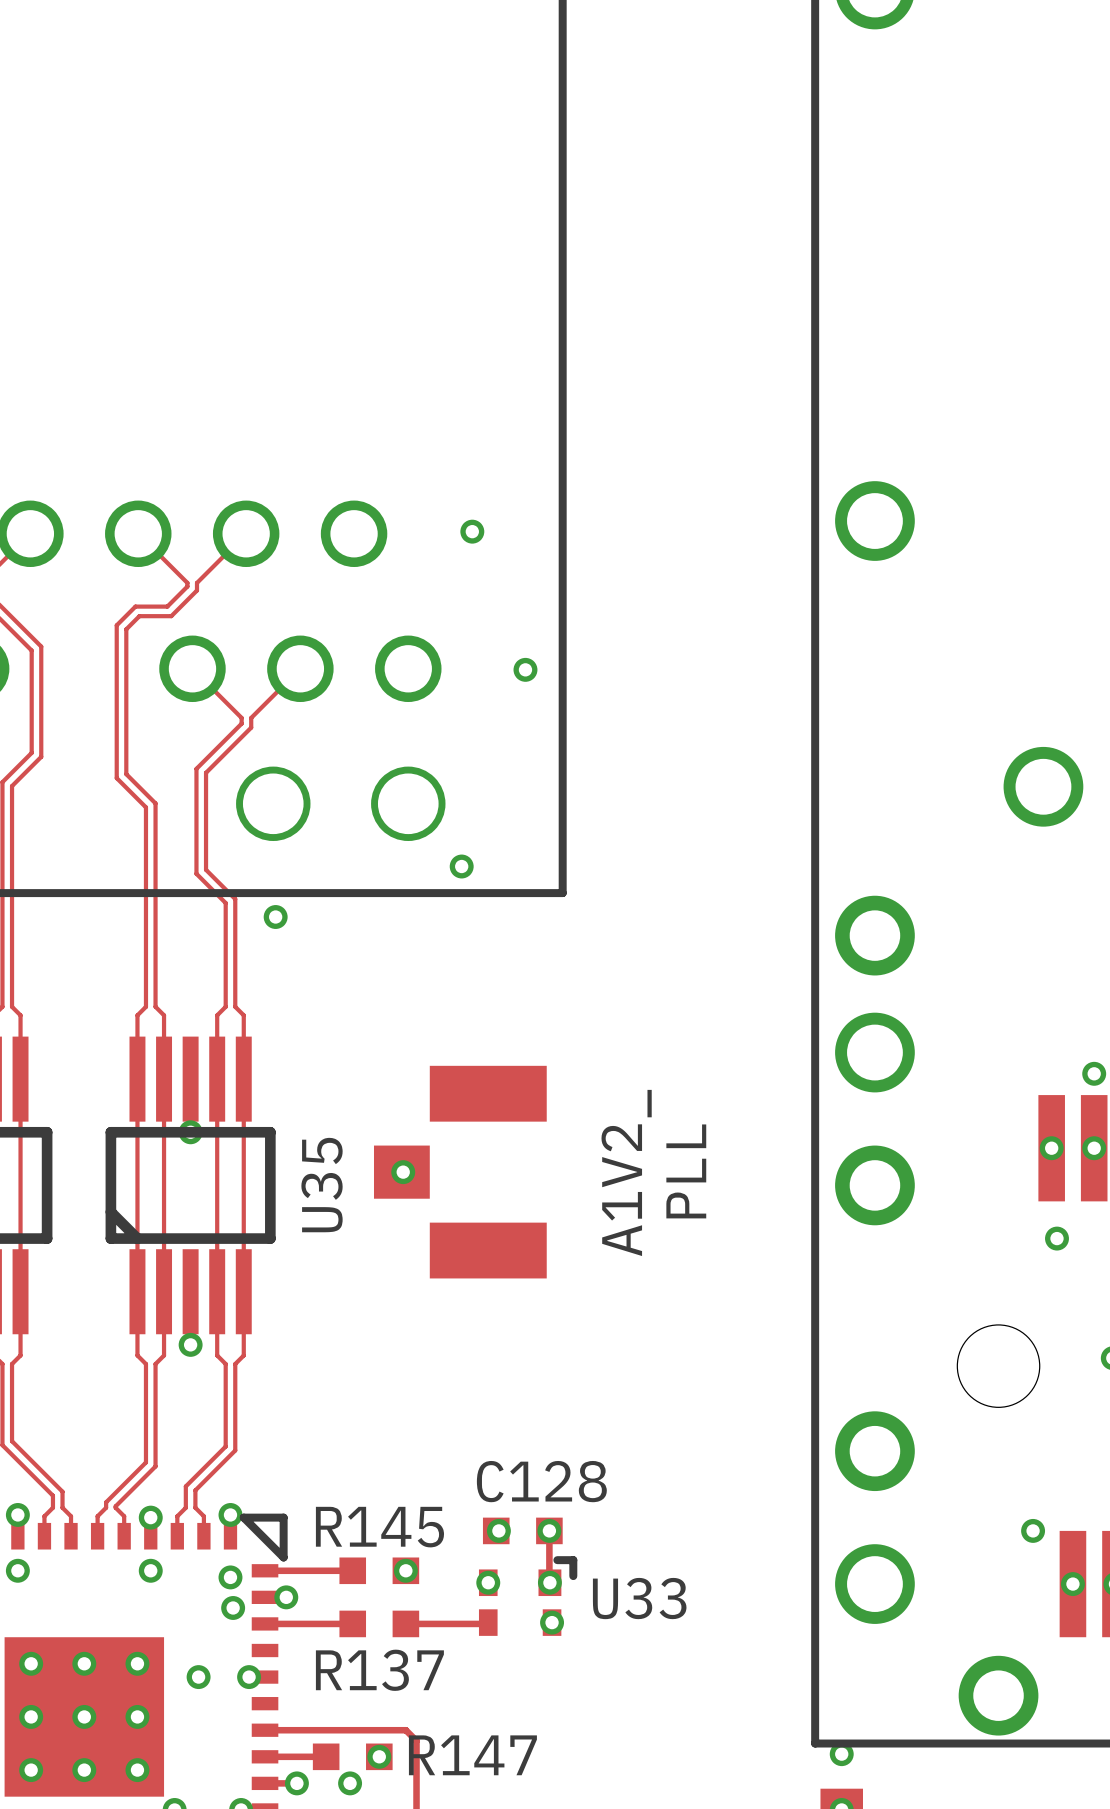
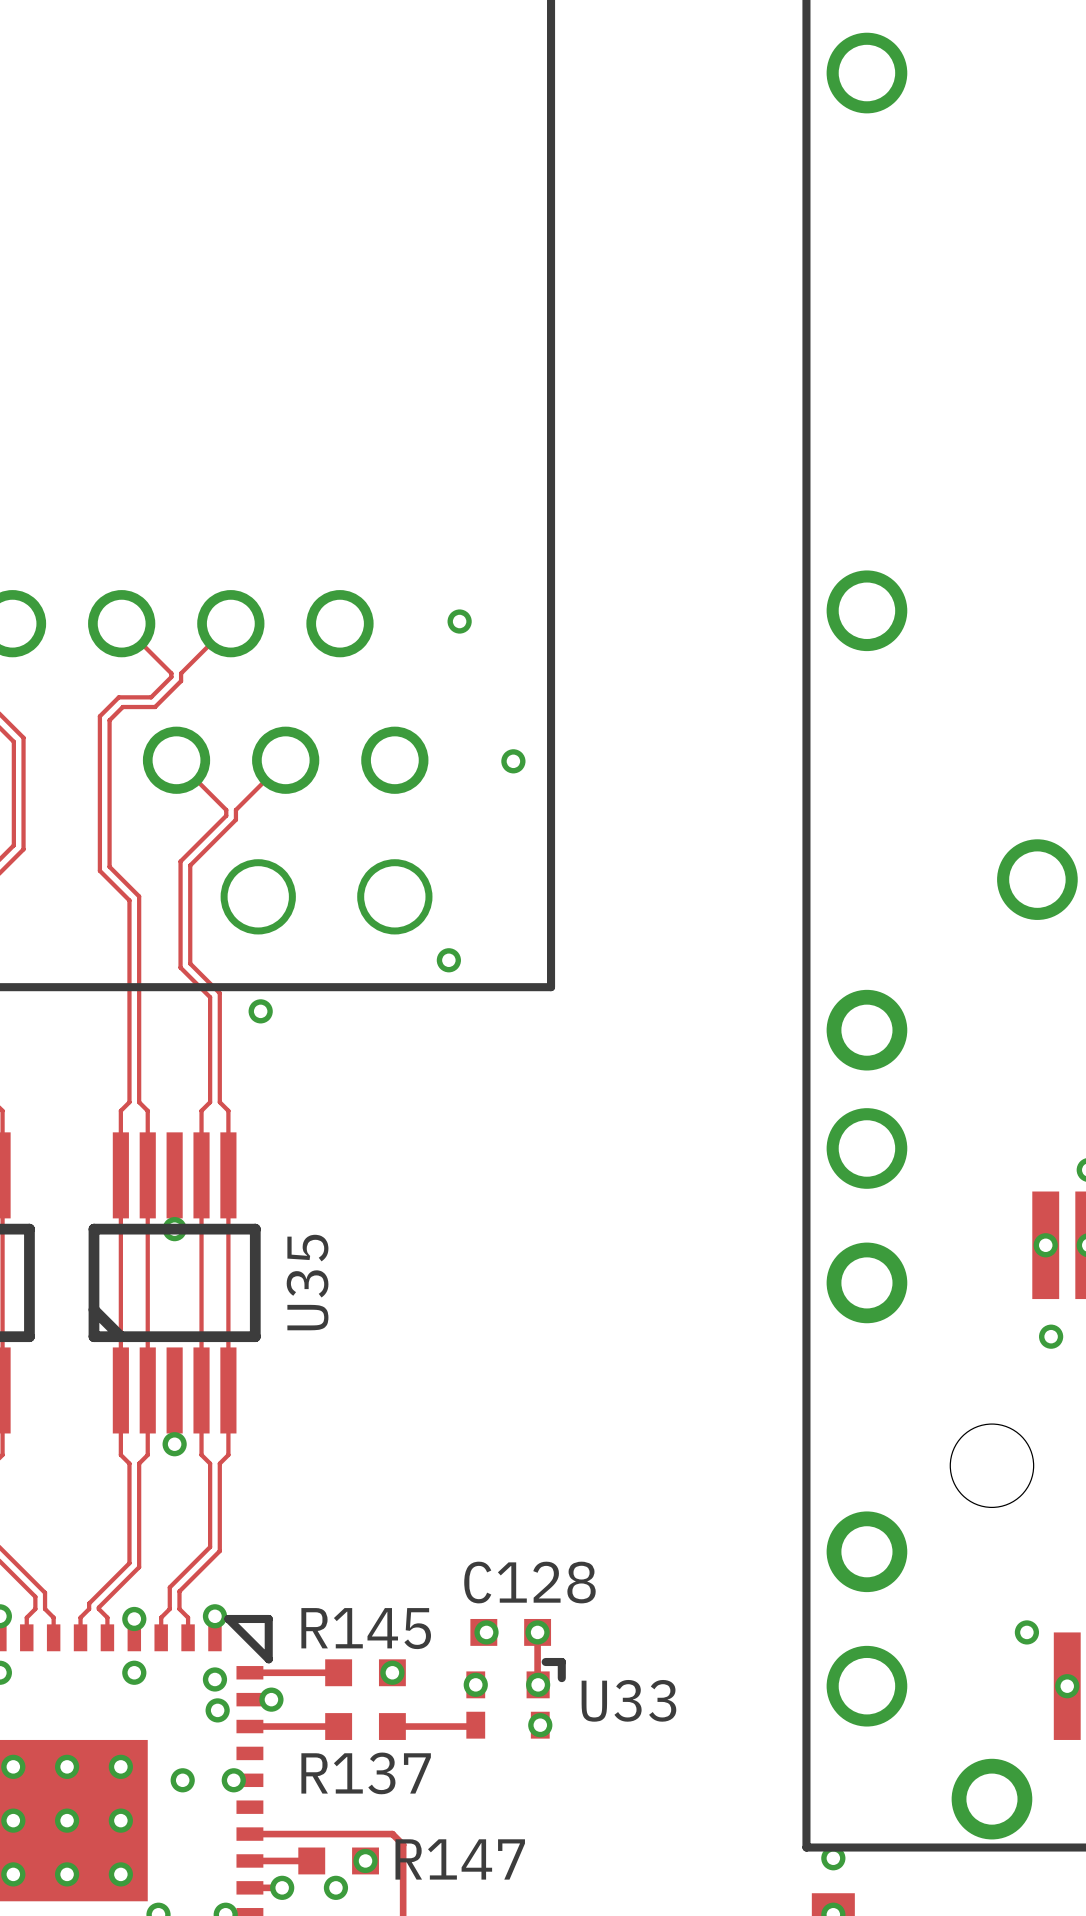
text: PLL (686, 1171) -> none
via: (403, 1172) -> none
part: (460, 1172) -> none
text: A1V2_ (626, 1172) -> none

